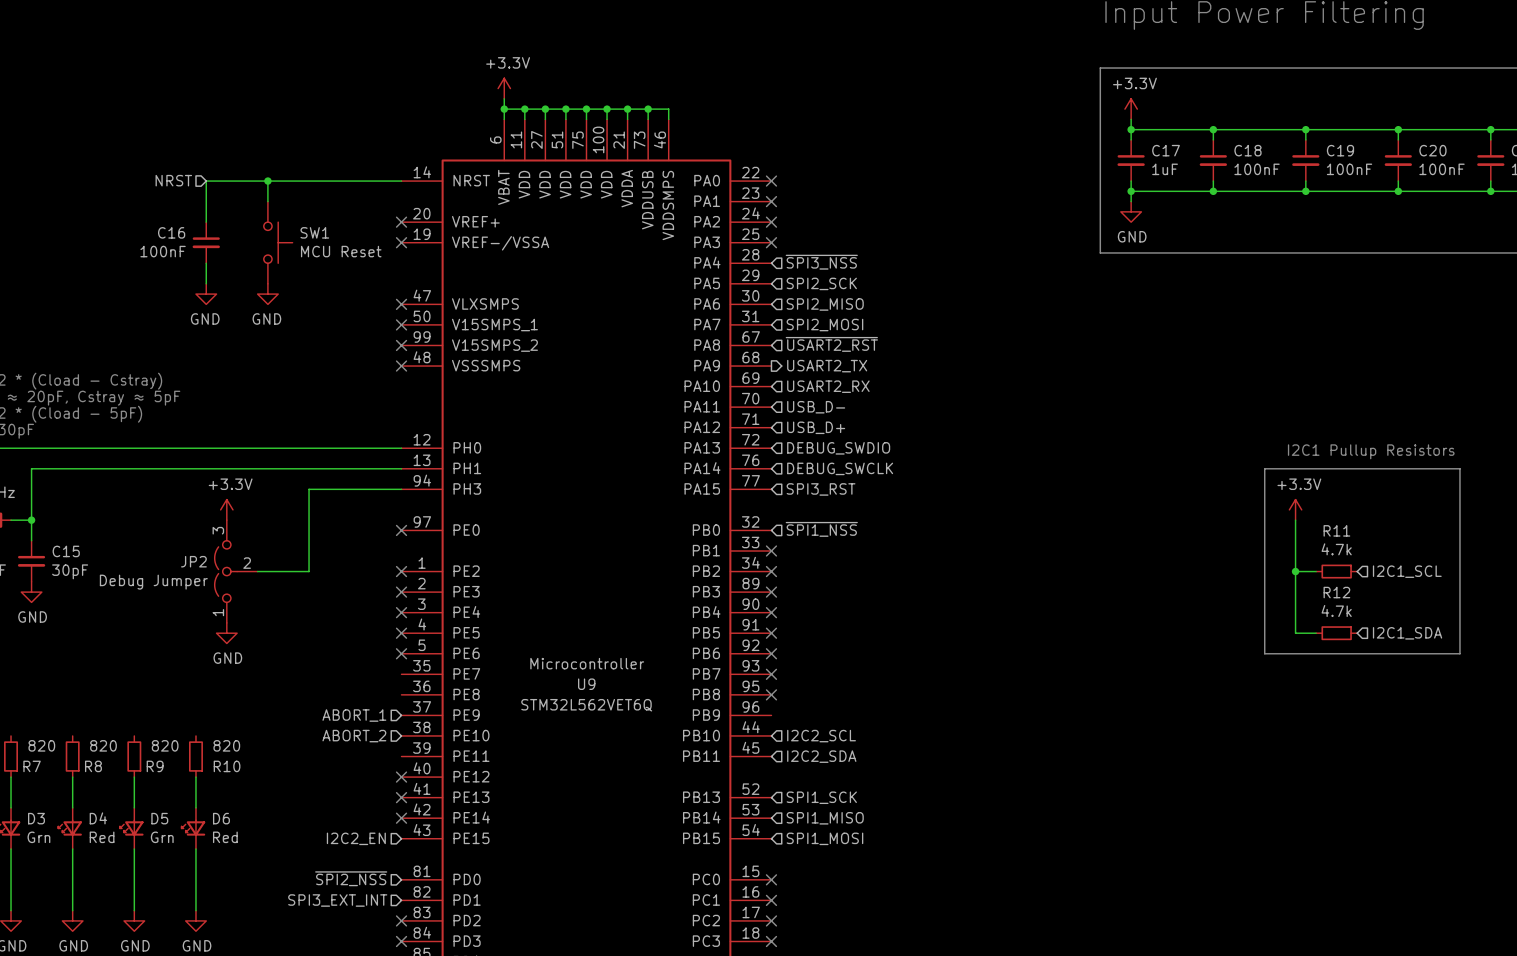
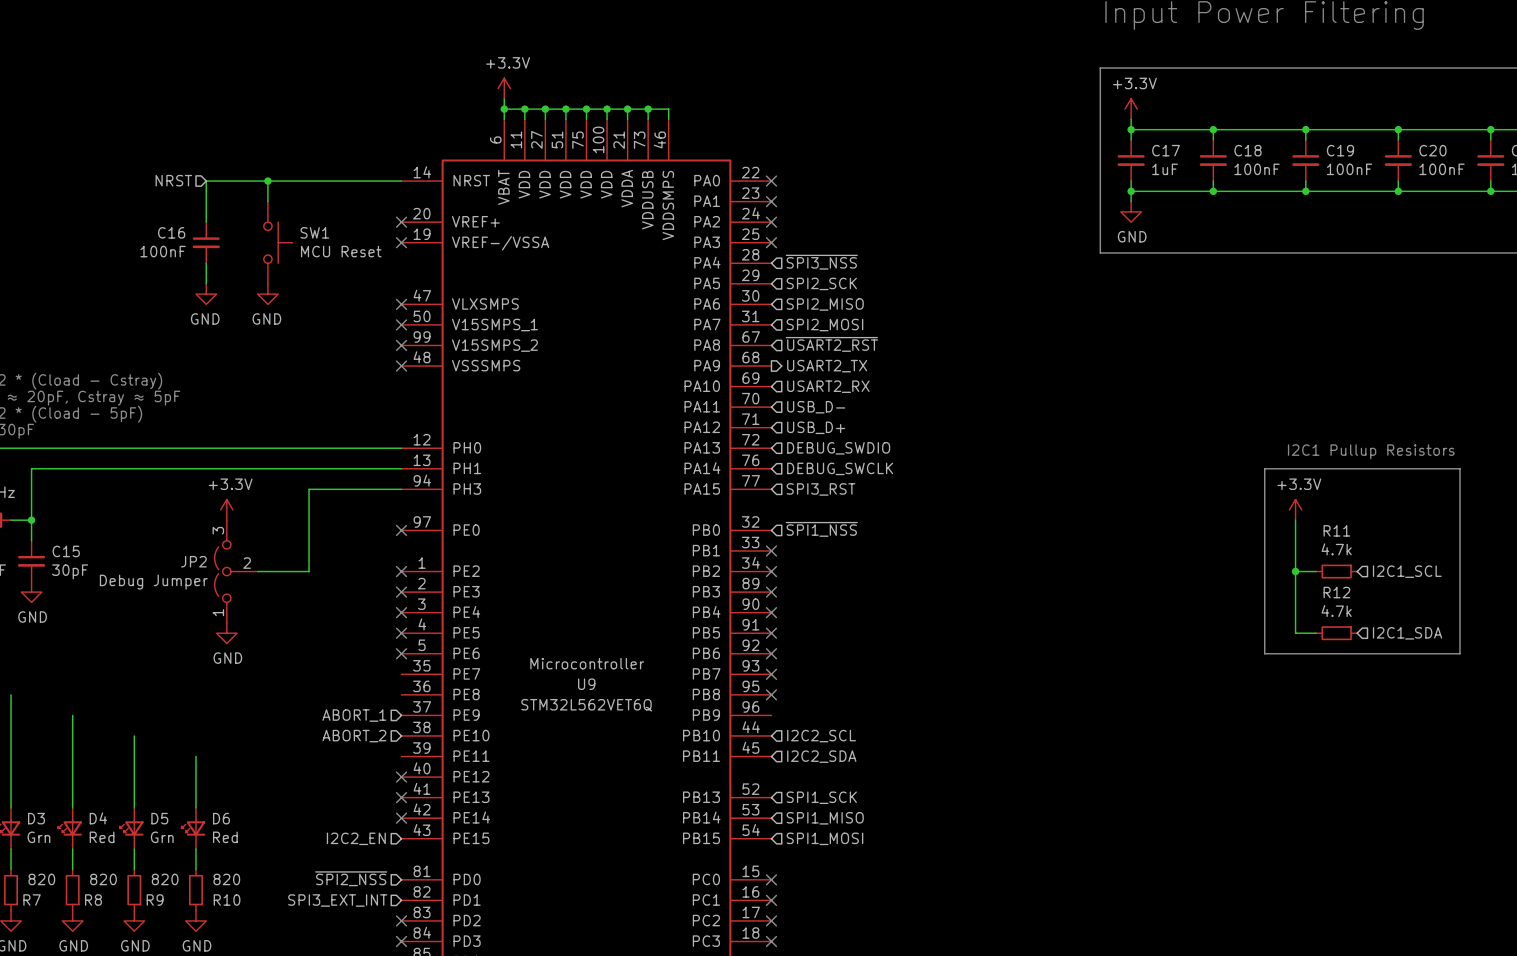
wire: none -> (11, 694) (11, 777)
wire: none -> (72, 715) (72, 777)
R7 position: (11, 756) -> (11, 890)
R8 position: (72, 756) -> (72, 890)
R9 position: (134, 756) -> (134, 890)
wire: none -> (195, 756) (195, 777)
R10 position: (195, 756) -> (195, 890)
wire: (11, 869) (11, 910) -> none
wire: (72, 869) (72, 910) -> none
wire: (134, 869) (134, 910) -> (134, 735) (134, 777)
wire: (195, 869) (195, 910) -> none

